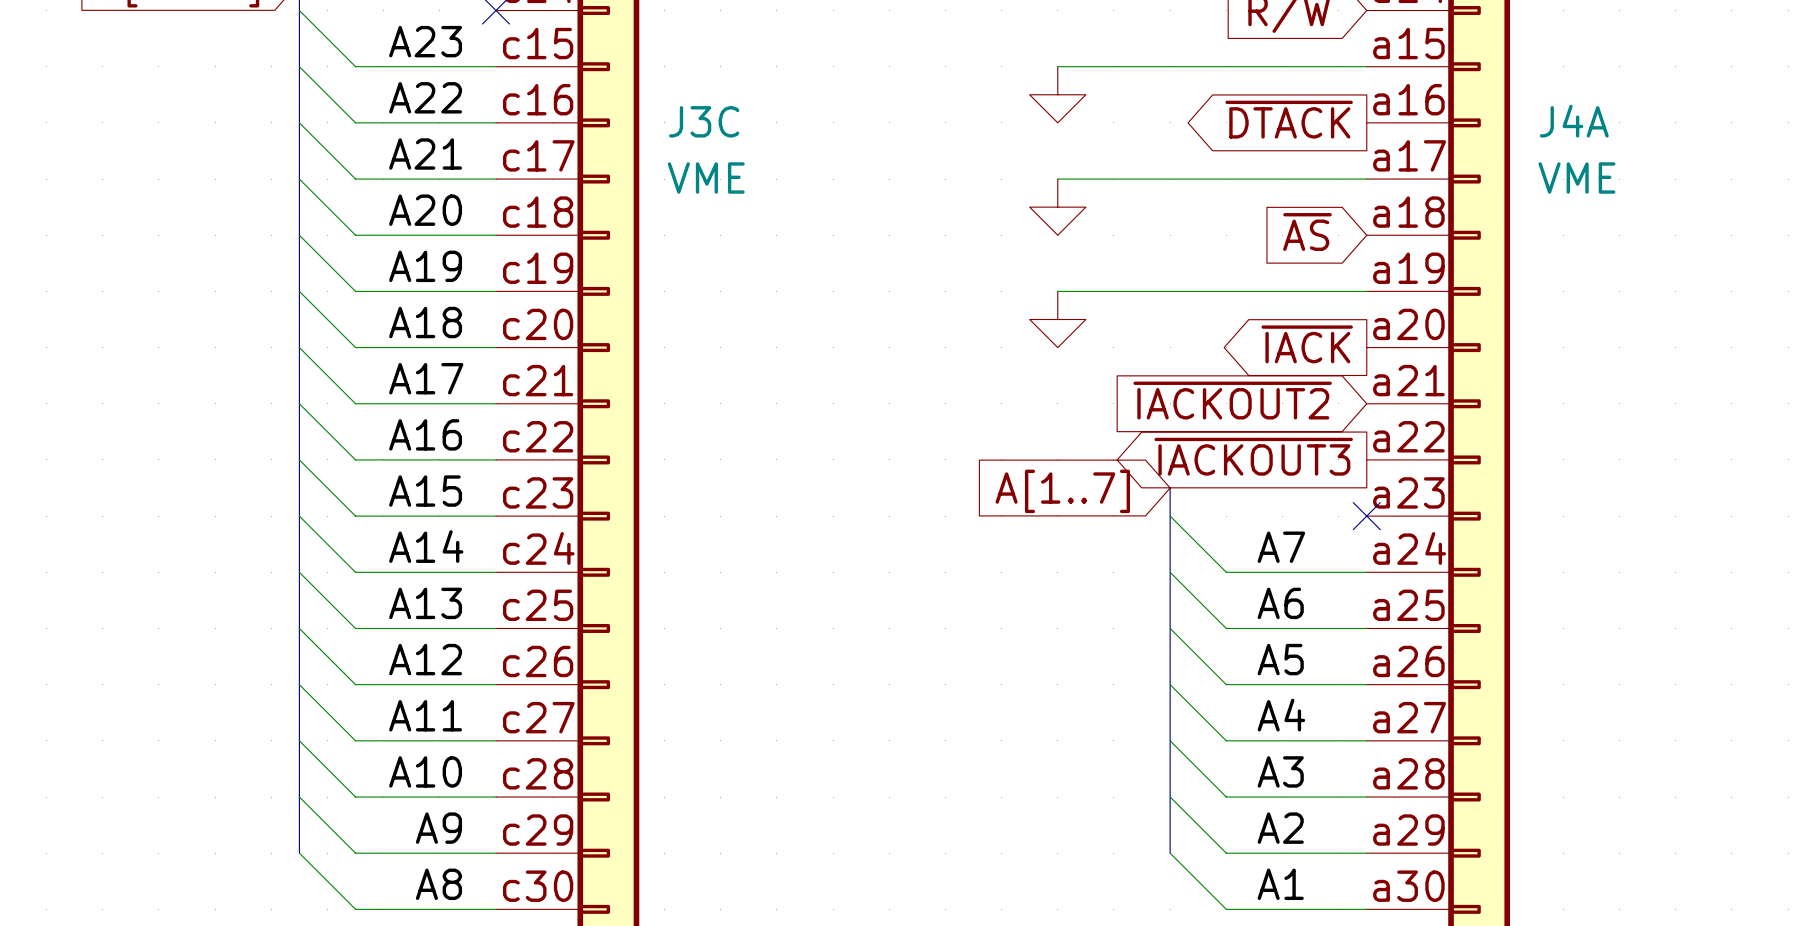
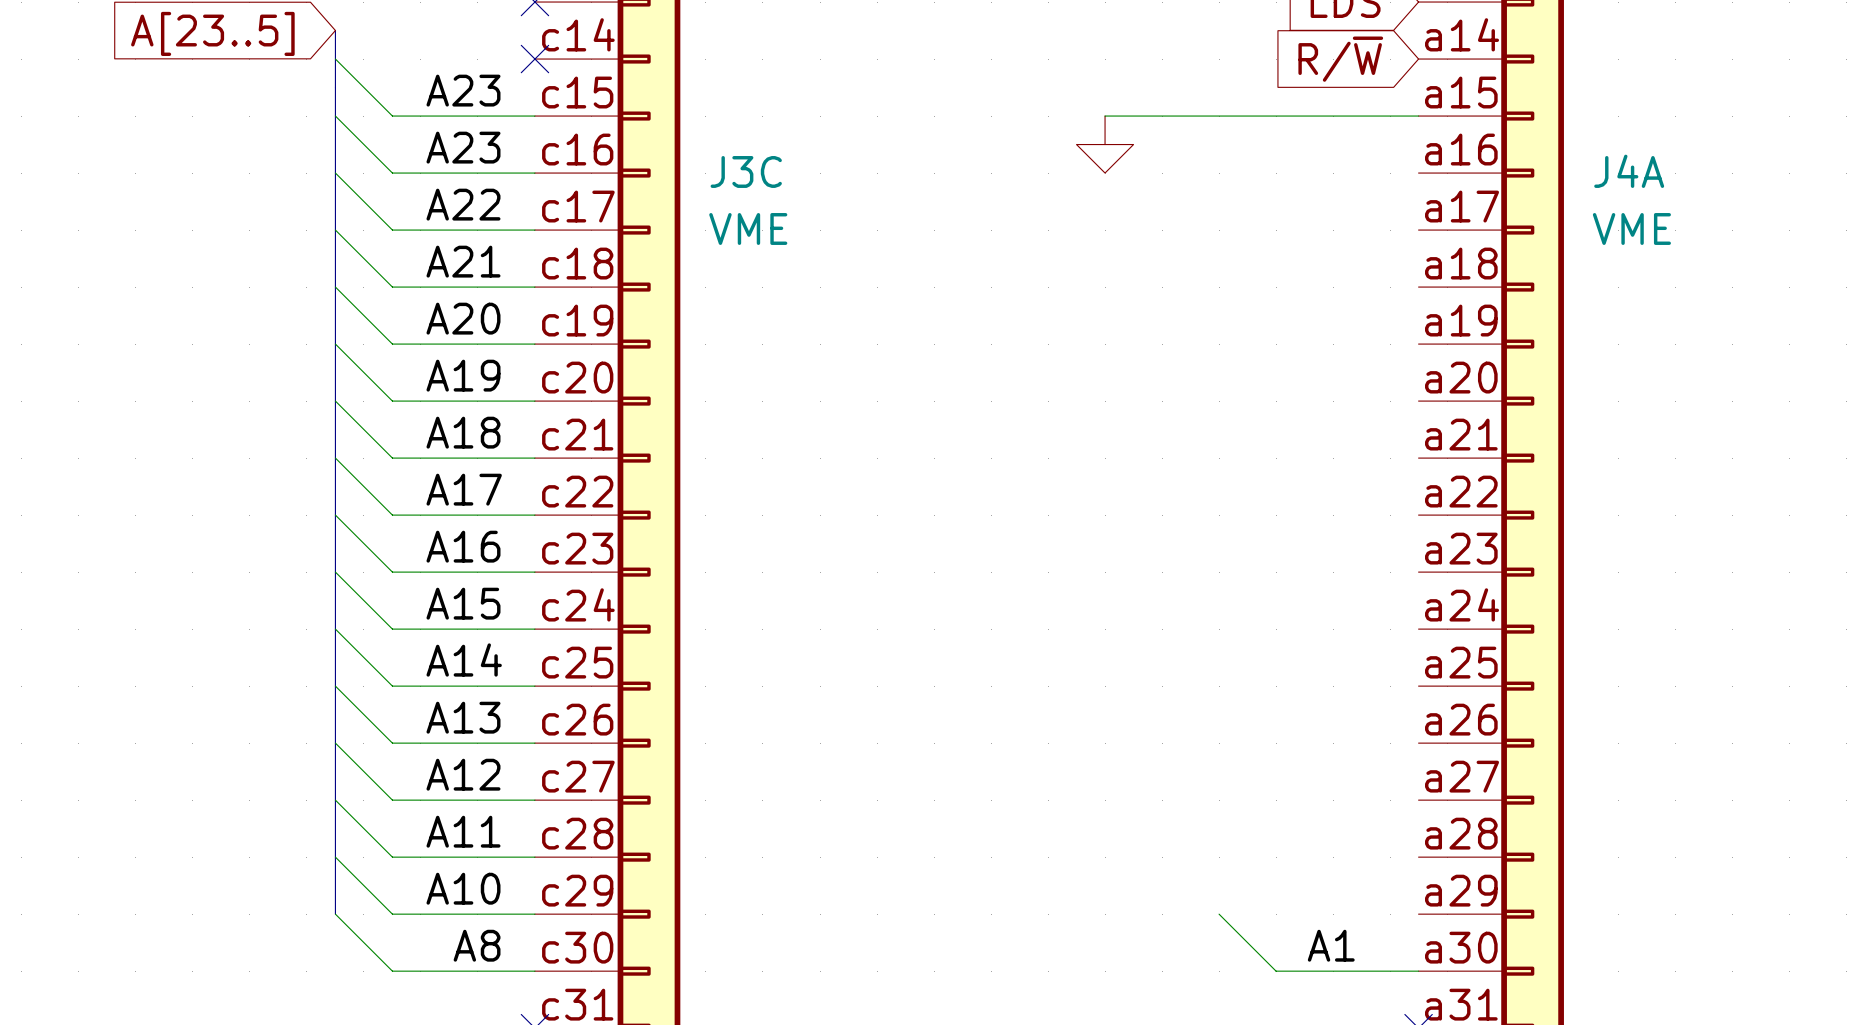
label: A22 (425, 97) -> A23 (463, 147)
global label: ~{DTACK} (1289, 119) -> none
label: A21 (425, 153) -> A22 (463, 204)
wire: (1057, 179) (1366, 179) -> none
power symbol: (1057, 207) -> none
label: A20 (425, 210) -> A21 (463, 261)
global label: ~{AS} (1307, 232) -> none
label: A19 (425, 266) -> A20 (463, 318)
wire: (1057, 291) (1366, 291) -> none
power symbol: (1057, 319) -> none
label: A18 (425, 322) -> A19 (463, 375)
global label: ~{IACK} (1307, 344) -> none
label: A17 (426, 378) -> A18 (463, 432)
global label: ~{IACKOUT2} (1232, 400) -> none
label: A16 (425, 434) -> A17 (464, 489)
global label: ~{IACKOUT3} (1253, 456) -> none
bus: (1170, 488) (1170, 853) -> none
label: A15 (425, 491) -> A16 (463, 546)
global label: A[1..7] (1062, 491) -> none
wire: (1170, 516) (1226, 572) (1366, 572) -> none
no-connect mark: (1366, 516) -> none
label: A14 (426, 546) -> A15 (463, 603)
label: A7 (1281, 547) -> none
wire: (1170, 572) (1226, 628) (1366, 628) -> none
label: A13 (425, 603) -> A14 (464, 660)
label: A6 (1280, 603) -> none
wire: (1170, 628) (1226, 684) (1366, 684) -> none
label: A12 (425, 659) -> A13 (463, 717)
label: A5 (1280, 659) -> none
wire: (1170, 684) (1226, 740) (1366, 740) -> none
label: A11 (425, 715) -> A12 (463, 774)
label: A4 (1281, 715) -> none
wire: (1170, 740) (1226, 797) (1366, 797) -> none
label: A10 (425, 771) -> A11 (463, 831)
label: A3 (1280, 771) -> none
wire: (1170, 797) (1226, 853) (1366, 853) -> none
label: A9 (438, 828) -> A10 (463, 888)
label: A2 (1280, 828) -> none

